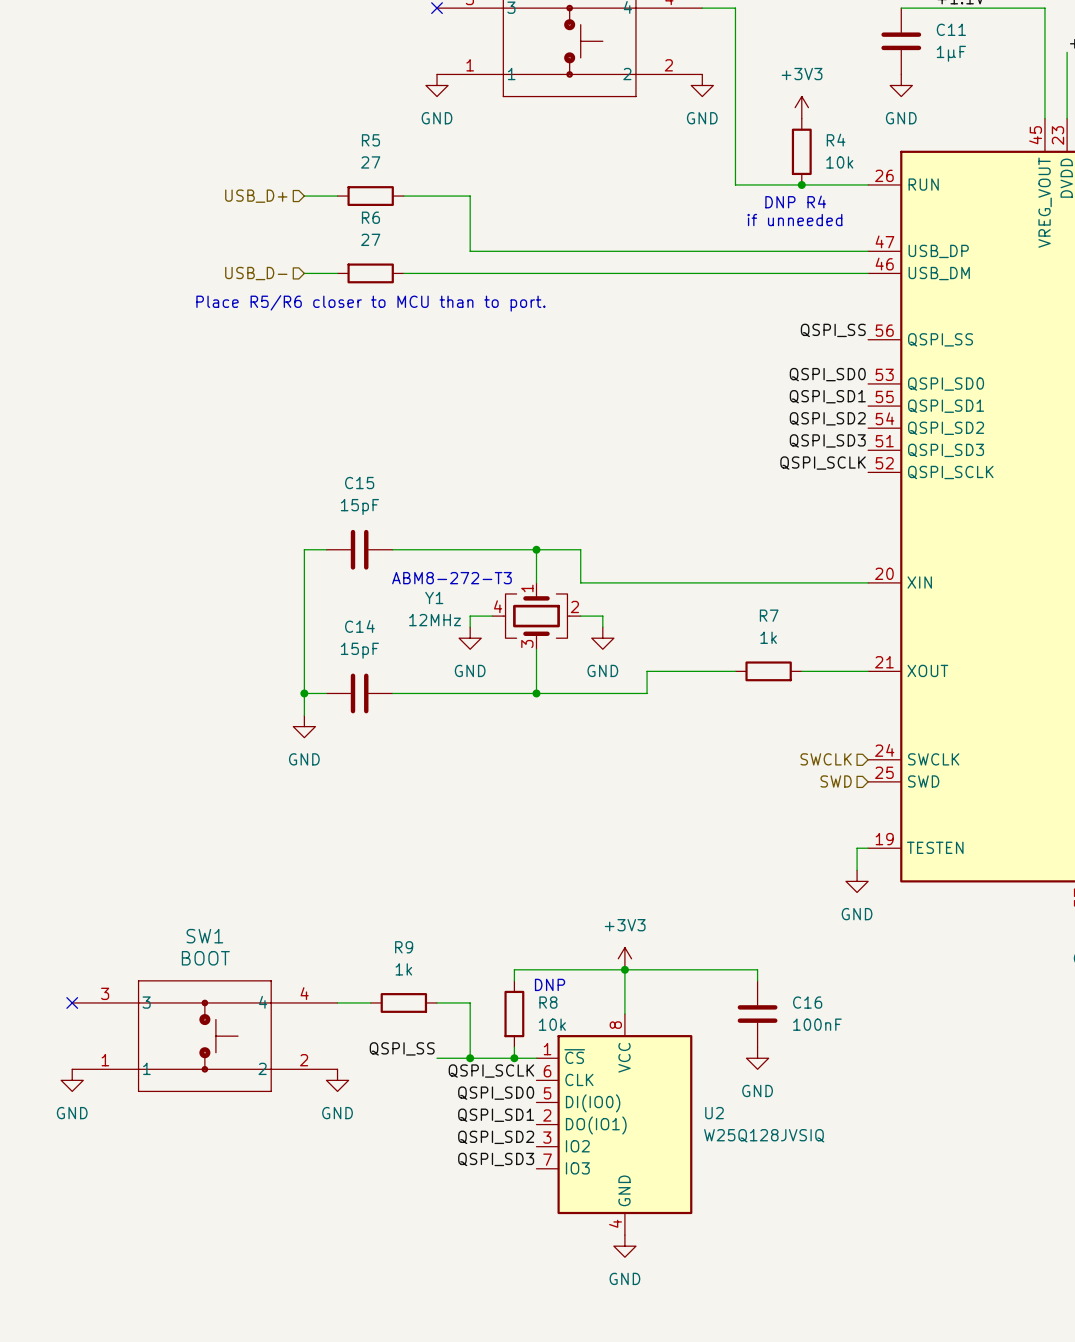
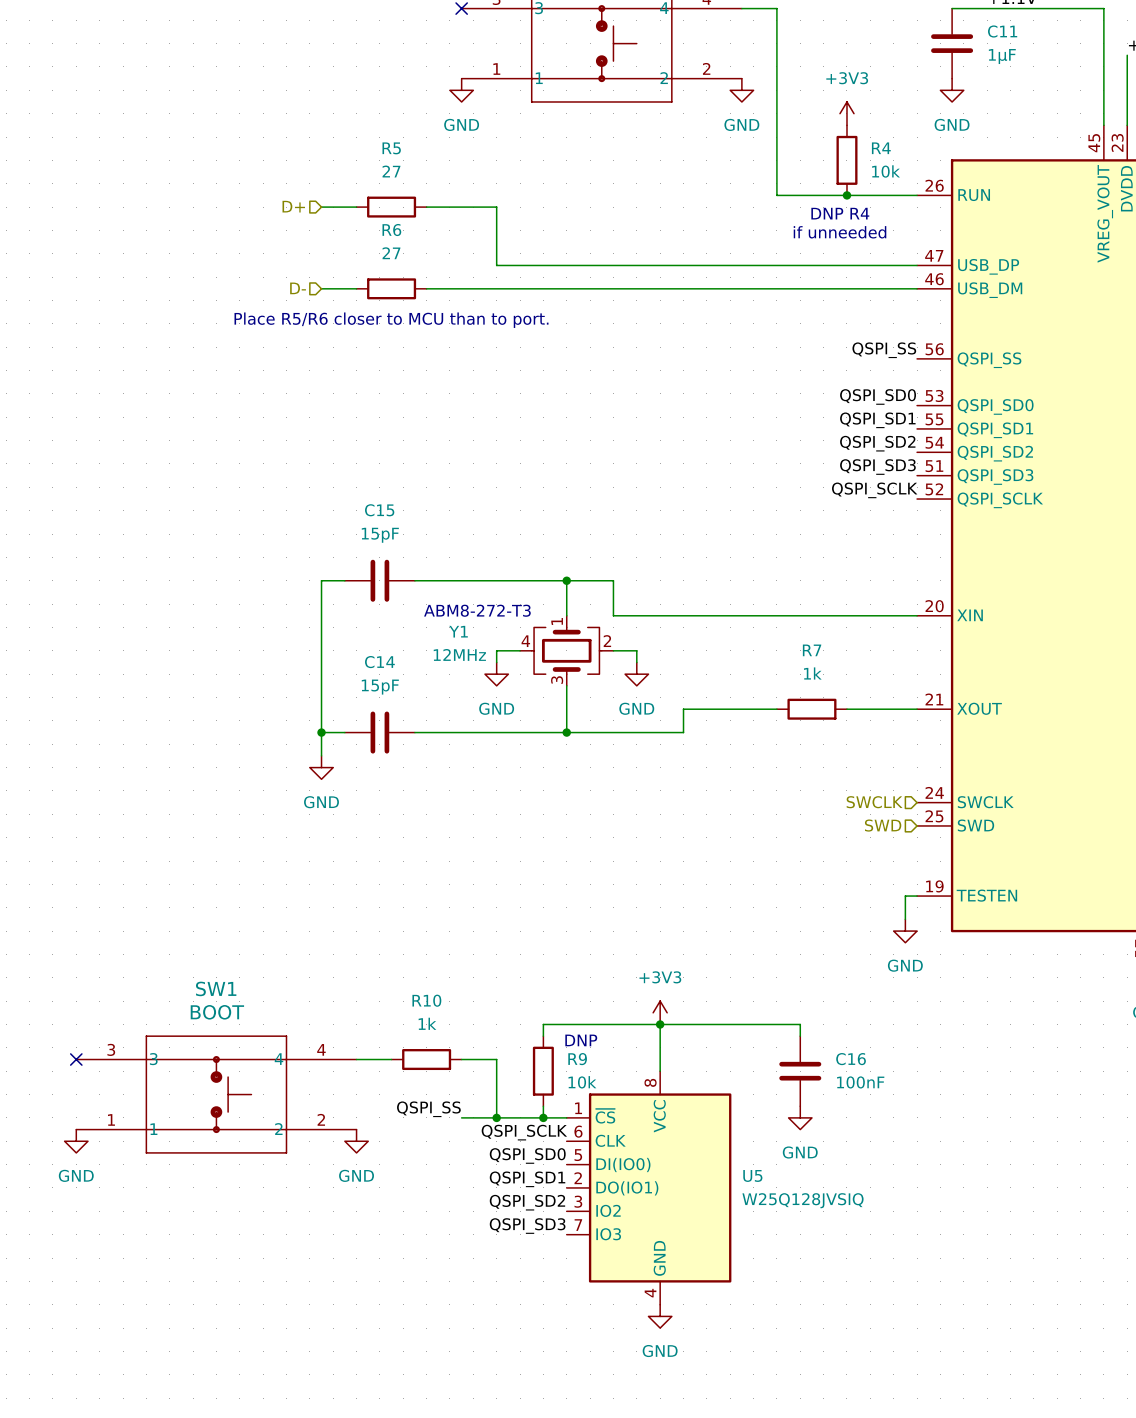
hierarchical label: USB_D+ (256, 196) -> D+ (293, 206)
hierarchical label: USB_D- (256, 273) -> D- (298, 288)
R9 name: R9 (404, 947) -> R10 (426, 1000)
R8 name: R8 (548, 1002) -> R9 (577, 1059)
U2 name: U2 (714, 1113) -> U5 (752, 1175)

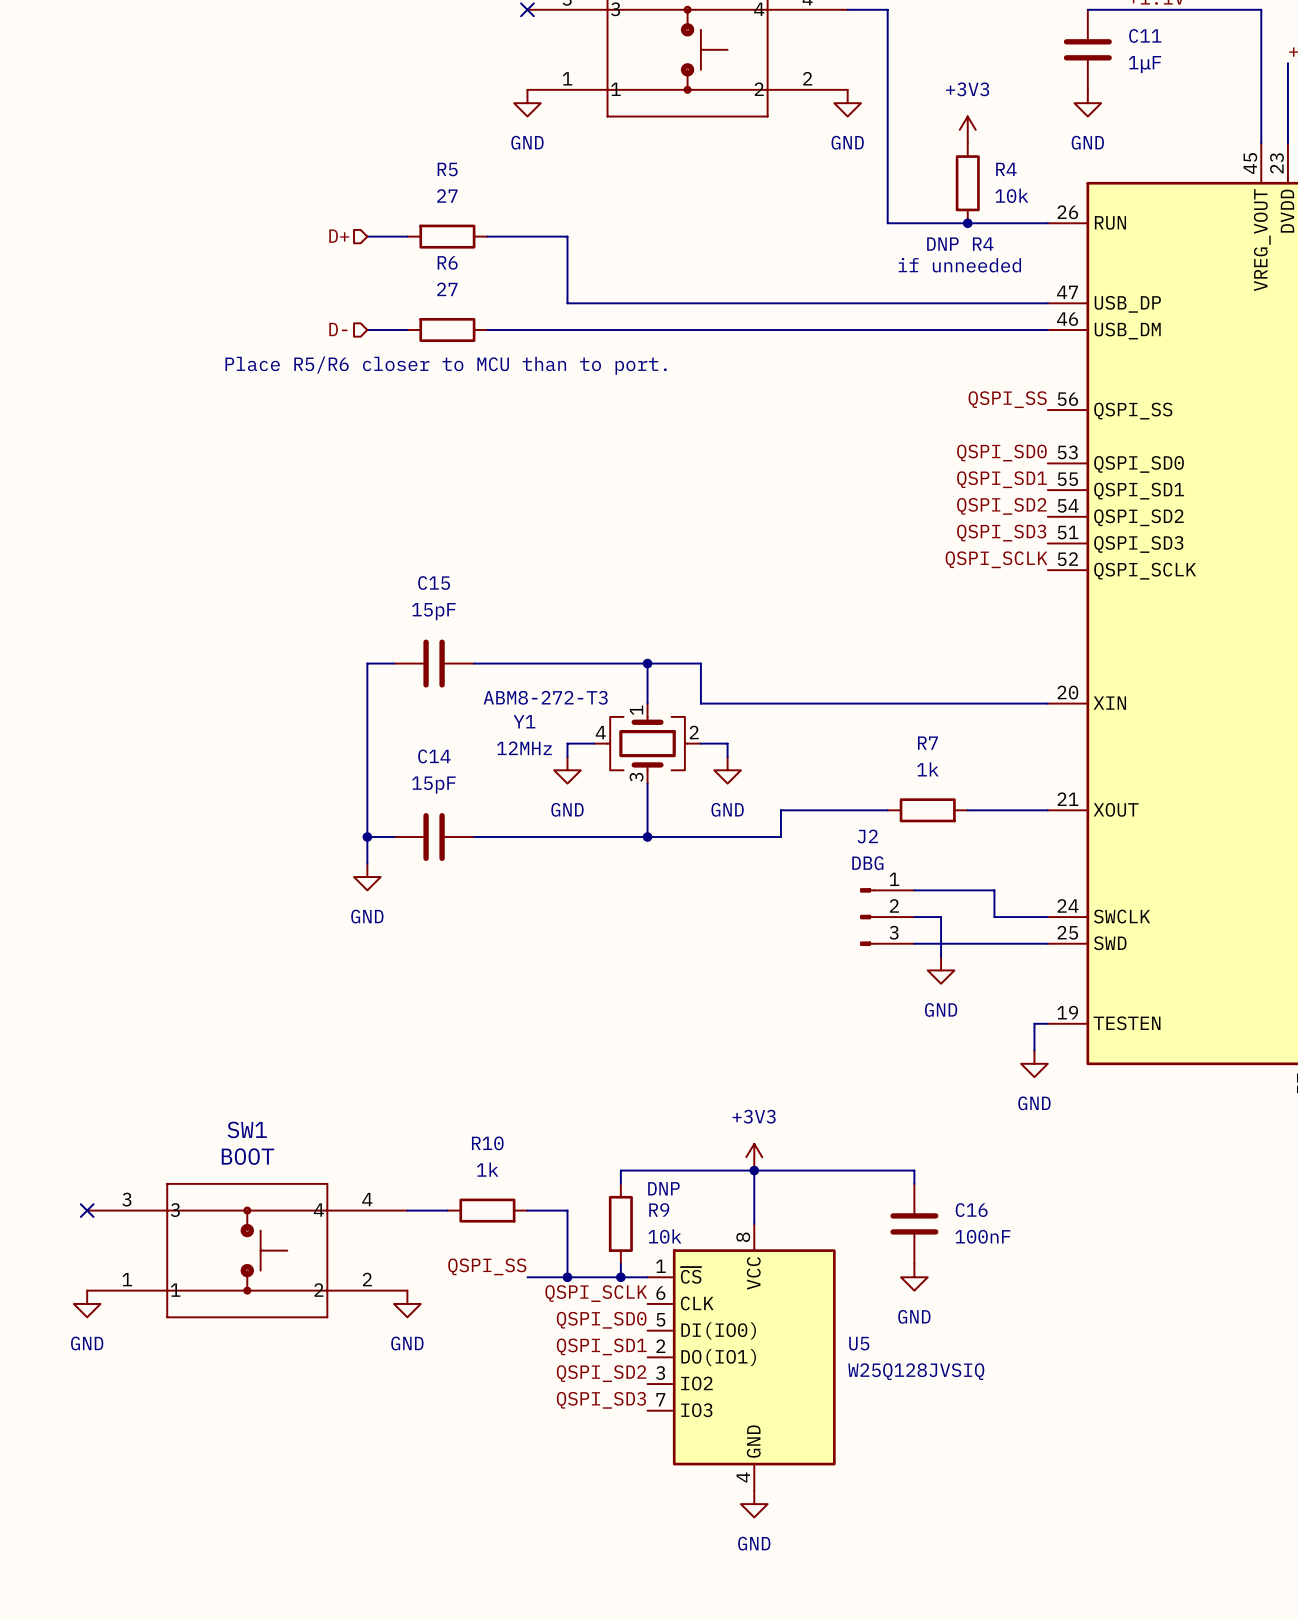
wire: none -> (914, 890) (994, 890) (994, 917) (1047, 917)
J2: none -> DBG (887, 917)
wire: none -> (914, 917) (941, 917) (941, 957)
hierarchical label: SWCLK (874, 802) -> none
wire: none -> (914, 943) (1047, 943)
hierarchical label: SWD (883, 825) -> none
power symbol: none -> GND (941, 970)

